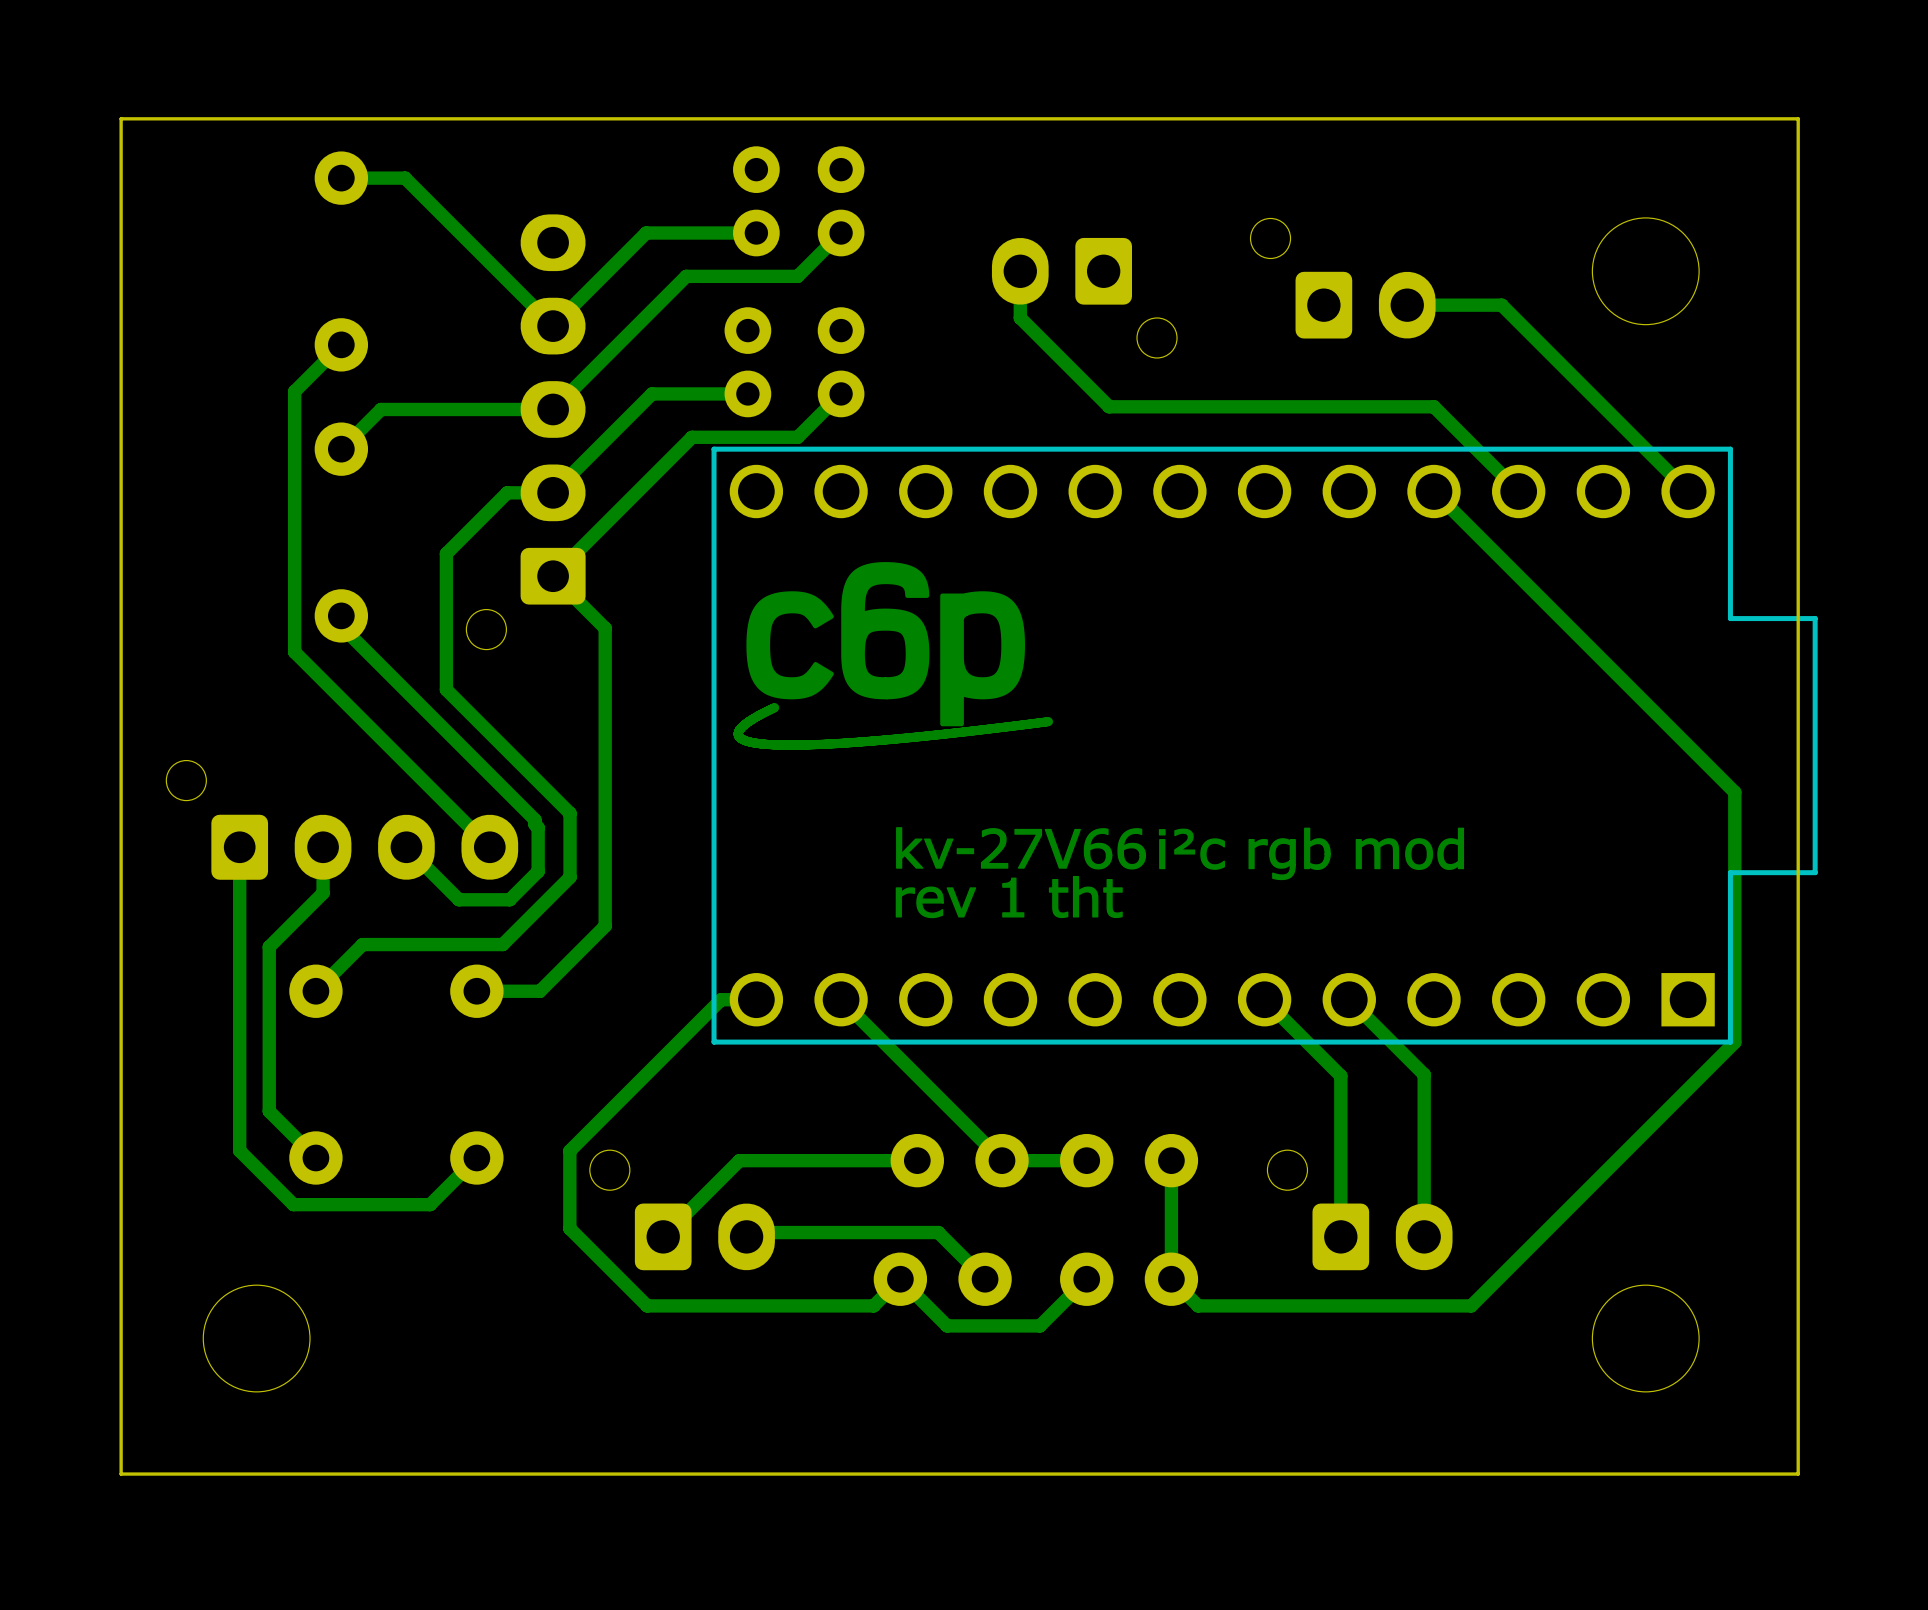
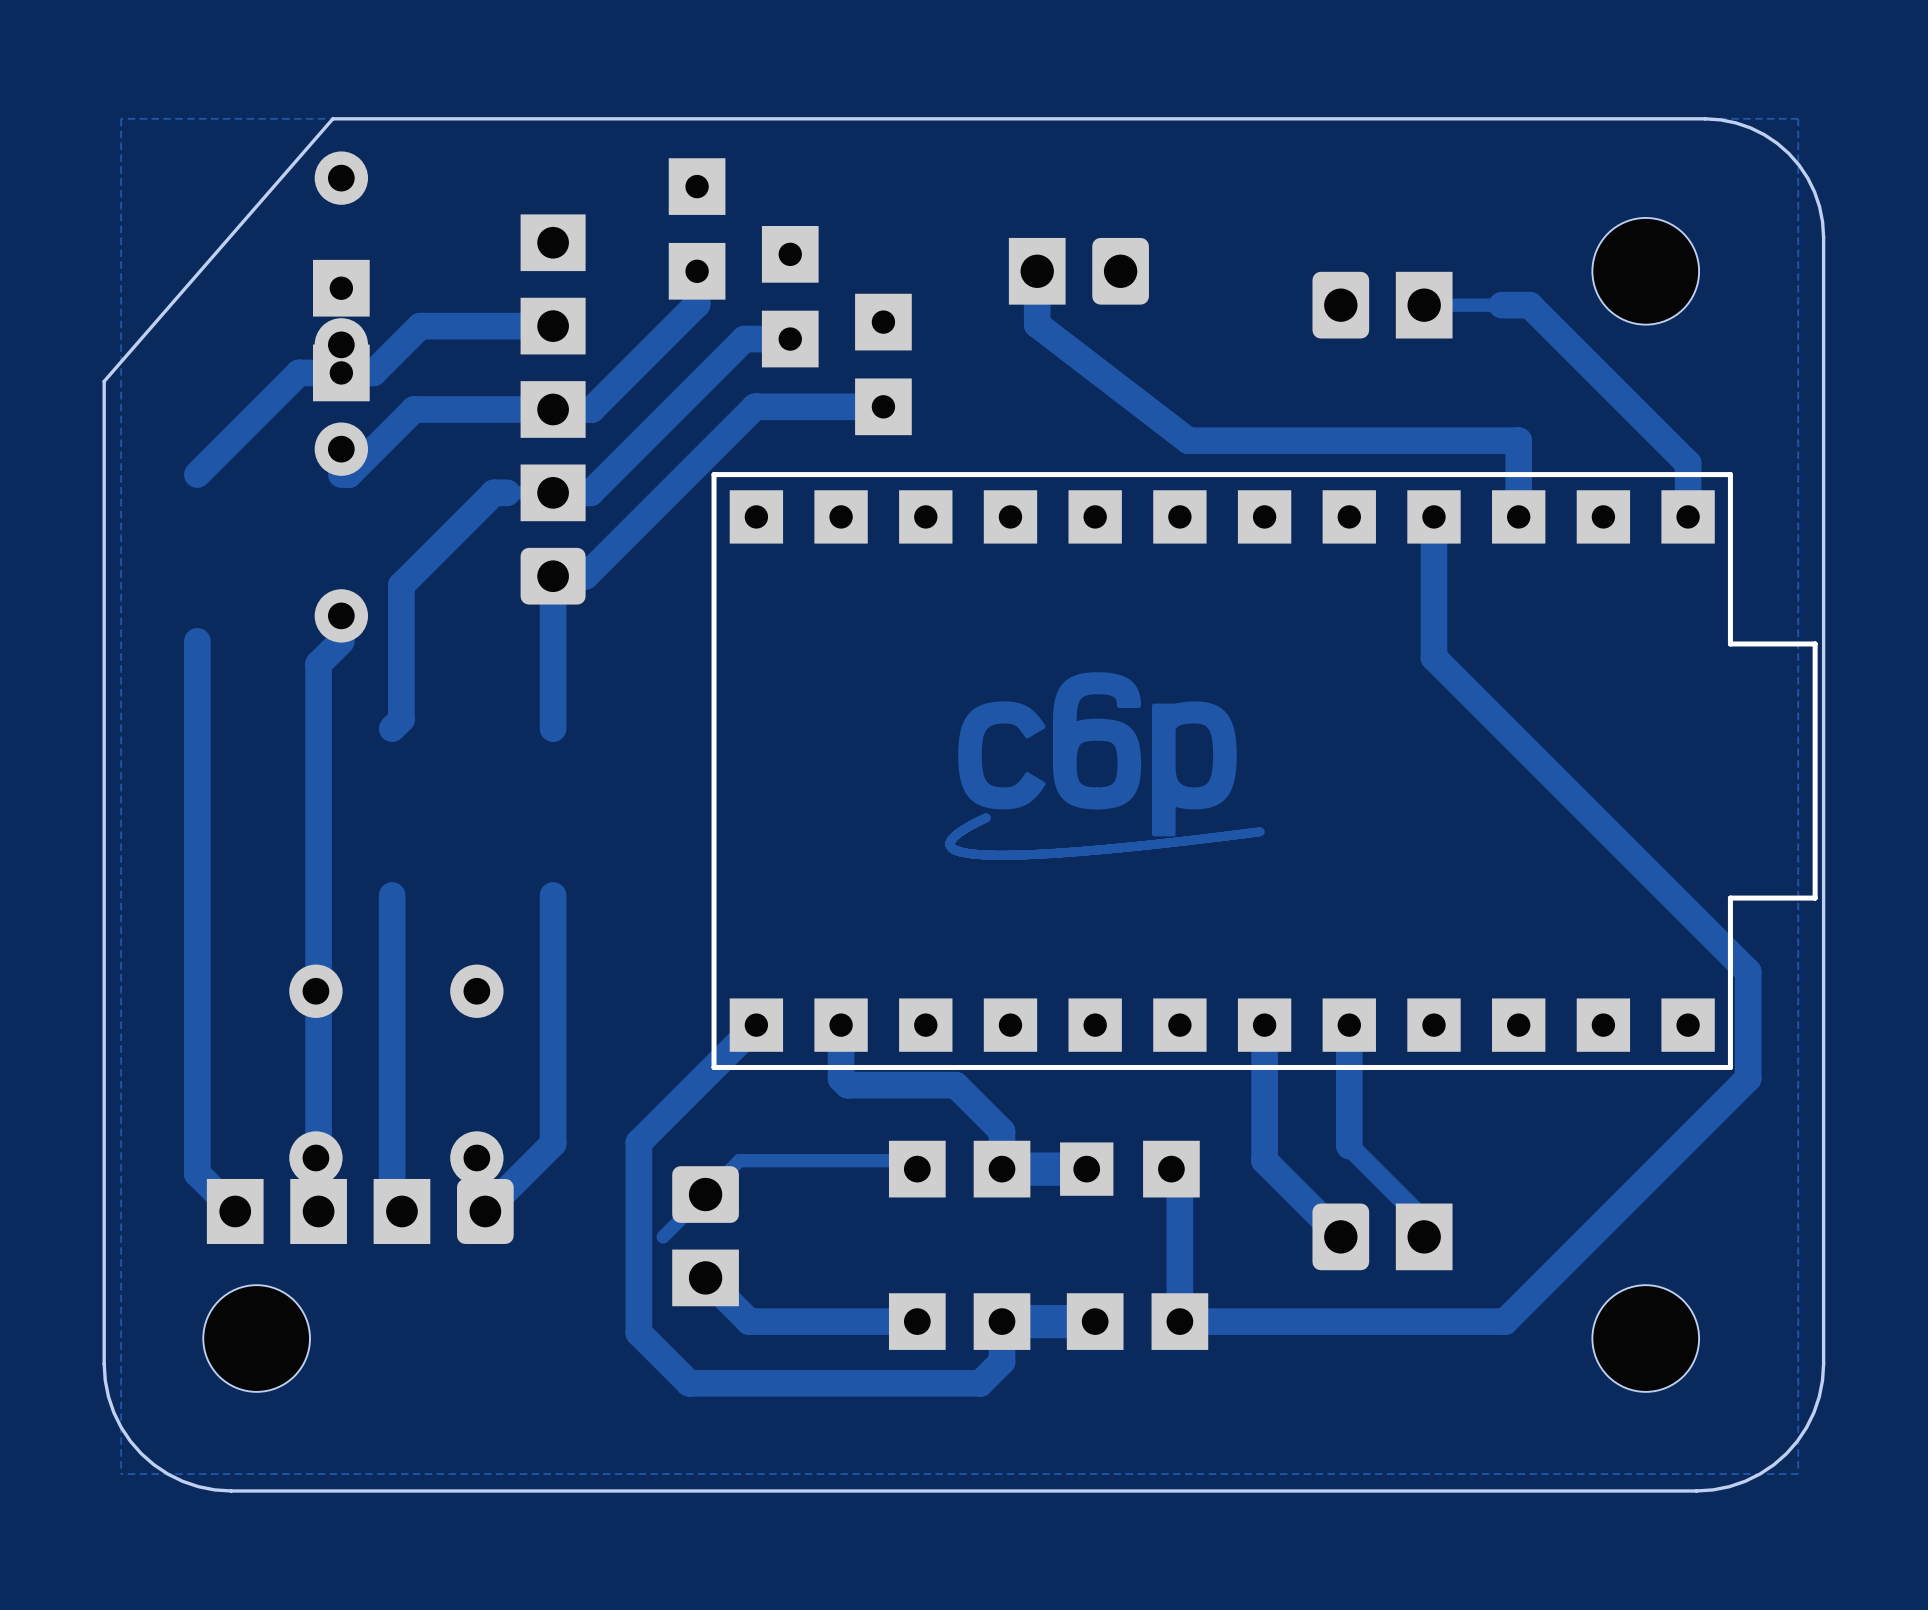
board edge: (1705, 118) (1798, 118) (1798, 1474) (121, 1474) (121, 118) (332, 118) -> (1705, 118) (1735, 122) (1750, 127) (1777, 143) (1788, 153) (1799, 165) (1814, 192) (1819, 206) (1823, 237) (1823, 1363) (1822, 1380) (1813, 1412) (1797, 1441) (1786, 1453) (1760, 1473) (1745, 1481) (1729, 1486) (1696, 1490) (214, 1489) (198, 1486) (167, 1473) (141, 1453) (130, 1441) (113, 1412) (105, 1380) (104, 381) (332, 118)
track: (341, 178) (405, 178) (553, 326) (646, 233) (756, 233) -> none
part: (756, 201) -> none
part: (841, 201) -> none
part: none -> (697, 228)
track: (841, 233) (797, 276) (686, 276) (553, 409) -> (697, 271) (697, 304) (591, 409) (553, 409)
part footprint: [991, 237, 1178, 358] -> [1008, 237, 1149, 305]
track: (1020, 271) (1020, 317) (1109, 406) (1433, 406) (1518, 491) -> none
track: none -> (1037, 271) (1037, 324) (1188, 440) (1518, 440) (1518, 516)
part: (1343, 278) -> none
part: none -> (790, 296)
part: none -> (1382, 305)
track: (1501, 305) (1688, 491) -> (1501, 305) (1529, 305) (1688, 463) (1688, 516)
track: none -> (553, 326) (420, 326) (373, 372) (298, 372) (197, 474)
part: none -> (341, 330)
track: (341, 344) (294, 391) (294, 652) (489, 847) -> none
part: (747, 362) -> none
part: (841, 362) -> none
part: none -> (883, 364)
track: (747, 393) (652, 393) (553, 492) -> (790, 339) (744, 339) (590, 492) (553, 492)
track: (841, 393) (797, 437) (692, 437) (553, 576) (605, 628) (605, 926) (540, 991) (476, 991) -> none
track: none -> (883, 406) (755, 406) (585, 576) (553, 576) (553, 728)
track: (414, 409) (381, 409) (341, 449) -> (414, 409) (349, 474) (341, 474)
track width: thin (553, 409) (414, 409) -> thick (553, 409) (414, 409)
part: none -> (553, 409)
part: (526, 431) -> none
part footprint: [711, 446, 1818, 1045] -> [711, 472, 1818, 1070]
track: (1433, 491) (1734, 792) (1734, 1042) (1471, 1305) (1198, 1305) (1171, 1279) (1171, 1160) -> none
track: (507, 492) (446, 553) (446, 689) (570, 813) (570, 877) (502, 944) (362, 944) (315, 991) -> (507, 492) (493, 492) (401, 585) (401, 719) (392, 728)
track: none -> (1433, 516) (1433, 657) (1748, 971) (1748, 1078) (1505, 1321) (1179, 1321) (1179, 1177) (1171, 1169)
track: (341, 615) (341, 626) (534, 819) (534, 824) (538, 827) (538, 871) (509, 899) (458, 899) (406, 847) -> none
track: none -> (197, 641) (197, 1173) (235, 1211)
track: none -> (341, 641) (318, 664) (318, 1211)
drawing position: (893, 655) -> (1105, 765)
part: (342, 820) -> none
drawing: [895, 827, 1465, 919] -> none
track: (239, 847) (239, 1150) (293, 1204) (430, 1204) (476, 1157) -> none
track: (323, 847) (323, 893) (269, 946) (269, 1111) (315, 1157) -> none
track: none -> (392, 895) (392, 1201) (401, 1211)
track: none -> (553, 895) (553, 1143) (485, 1211)
track: (756, 999) (721, 999) (569, 1150) (569, 1228) (647, 1305) (873, 1305) (900, 1279) (947, 1325) (1040, 1325) (1086, 1279) -> none
track: (841, 999) (1002, 1160) (1086, 1160) -> none
track: (1264, 999) (1340, 1075) (1340, 1236) -> (1264, 1025) (1264, 1160) (1340, 1236)
track: (1349, 999) (1424, 1074) (1424, 1221) -> (1349, 1025) (1349, 1146) (1424, 1221)
track: none -> (756, 1025) (638, 1142) (638, 1332) (689, 1383) (980, 1383) (1002, 1361) (1002, 1321) (1095, 1321)
track: none -> (841, 1025) (841, 1078) (847, 1085) (955, 1085) (1002, 1131) (1002, 1169) (1086, 1169)
part footprint: [890, 1133, 1029, 1188] -> [888, 1140, 1031, 1198]
part footprint: [1060, 1133, 1199, 1188] -> [1060, 1140, 1200, 1198]
part: (682, 1210) -> none
part: (1359, 1210) -> none
part: none -> (360, 1211)
part: none -> (705, 1236)
track: (746, 1236) (750, 1232) (938, 1232) (985, 1279) -> none
part: none -> (1382, 1236)
track: none -> (705, 1277) (749, 1321) (917, 1321)
part: (942, 1279) -> none
part: (1129, 1279) -> none
part: none -> (959, 1321)
part: none -> (1137, 1321)

